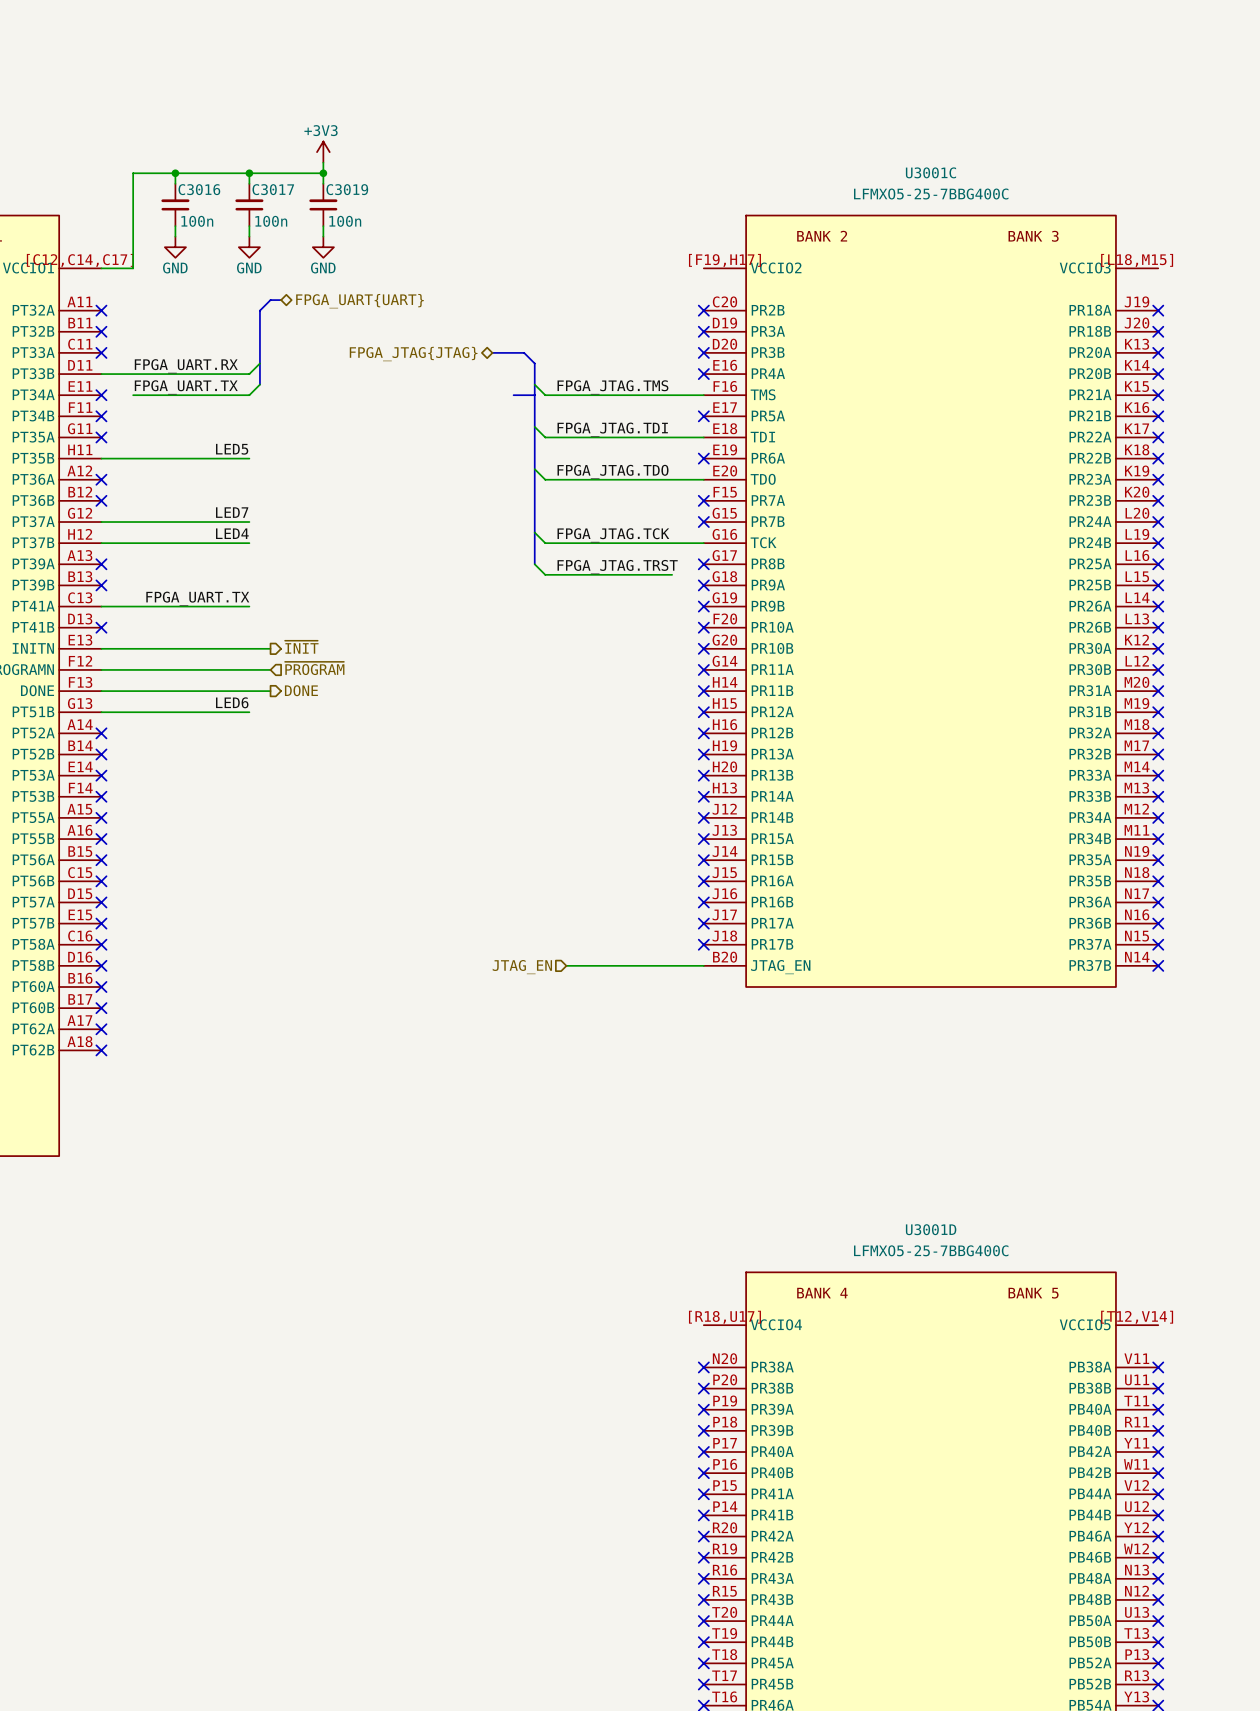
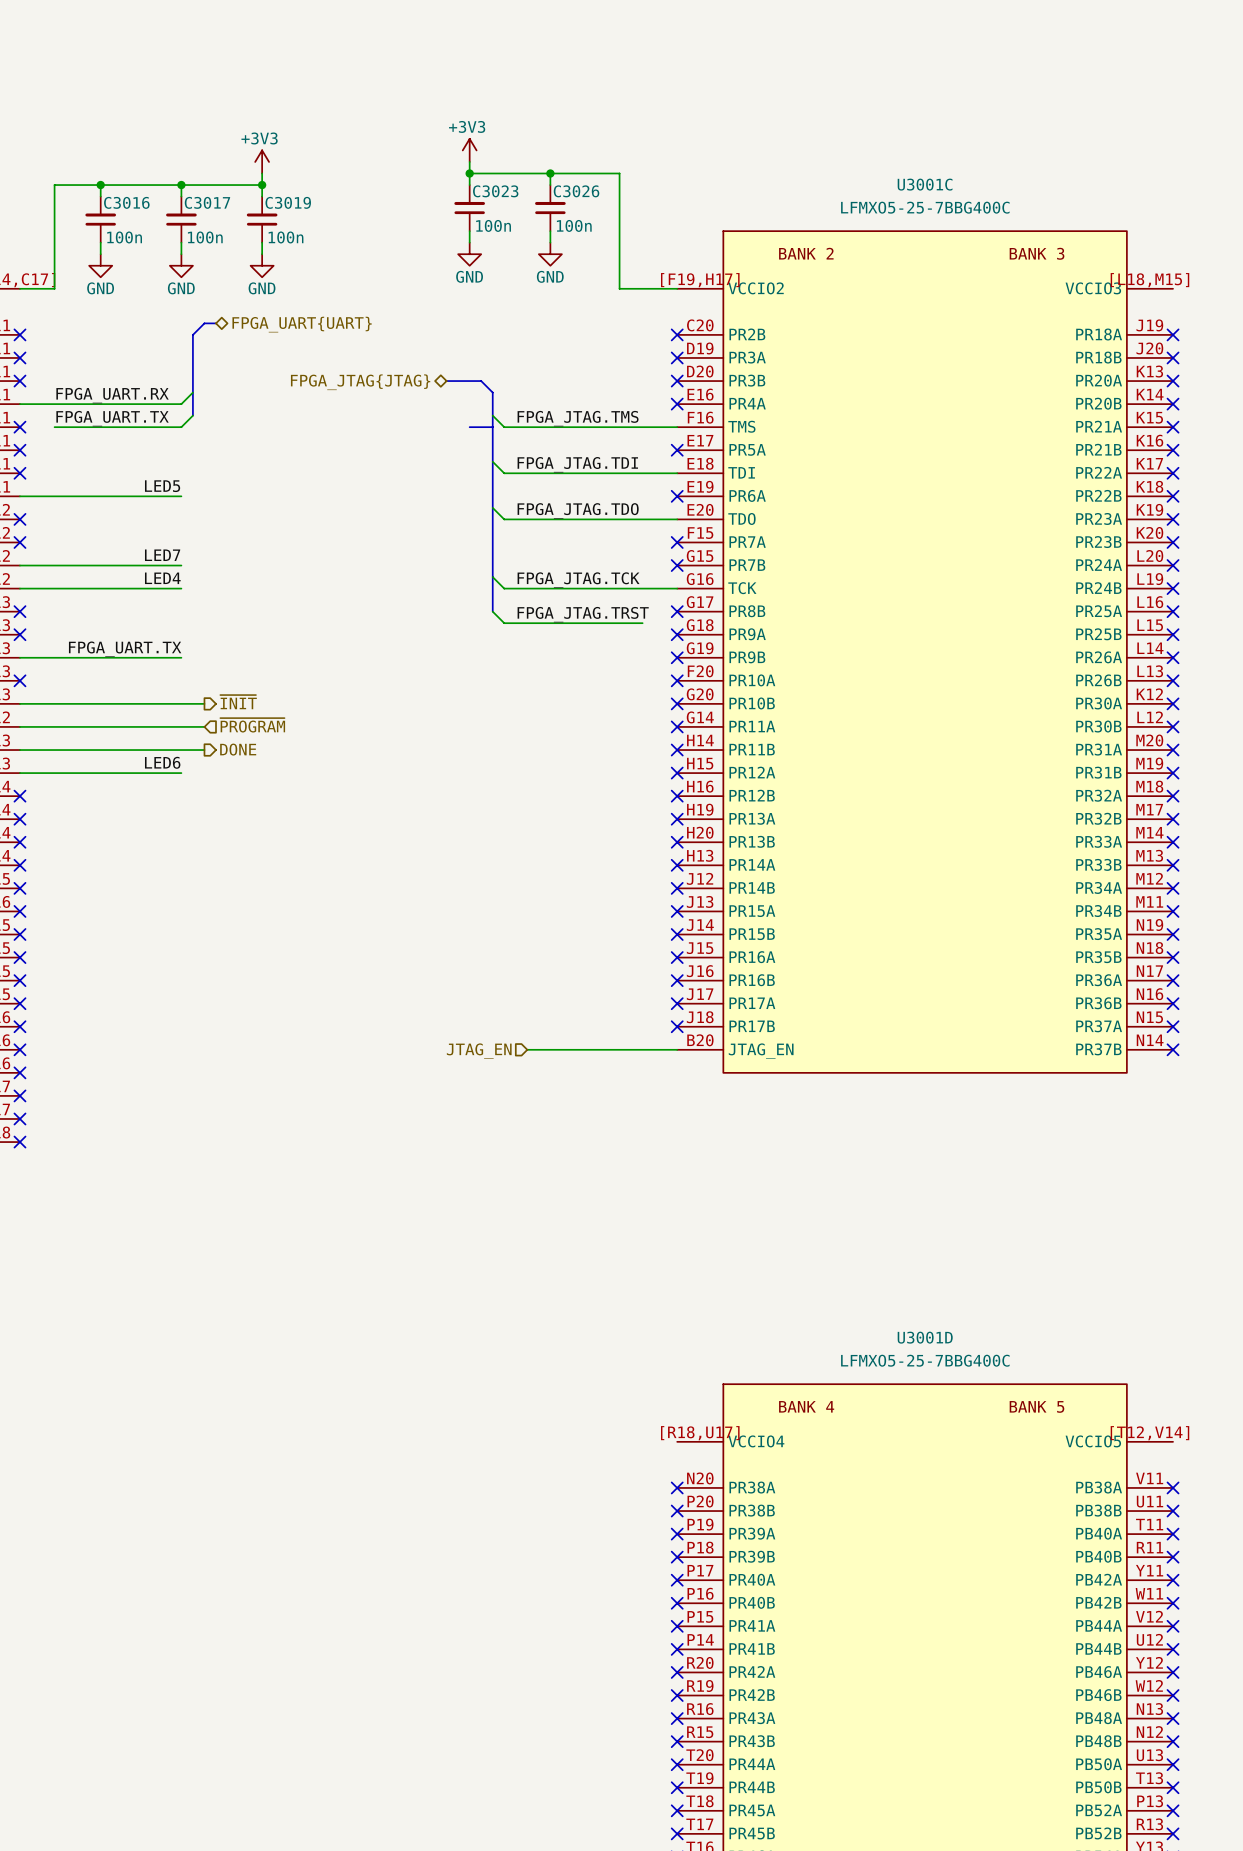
power symbol: none -> +3V3 (469, 150)
wire: none -> (469, 161) (469, 185)
wire: none -> (469, 173) (619, 173) (619, 288) (677, 288)
junction: none -> (469, 173)
wire: none -> (550, 173) (550, 185)
junction: none -> (550, 173)
C3023: none -> (469, 208)
C3026: none -> (550, 208)
wire: none -> (469, 231) (469, 242)
wire: none -> (550, 231) (550, 242)
power symbol: none -> GND (469, 254)
power symbol: none -> GND (550, 254)

